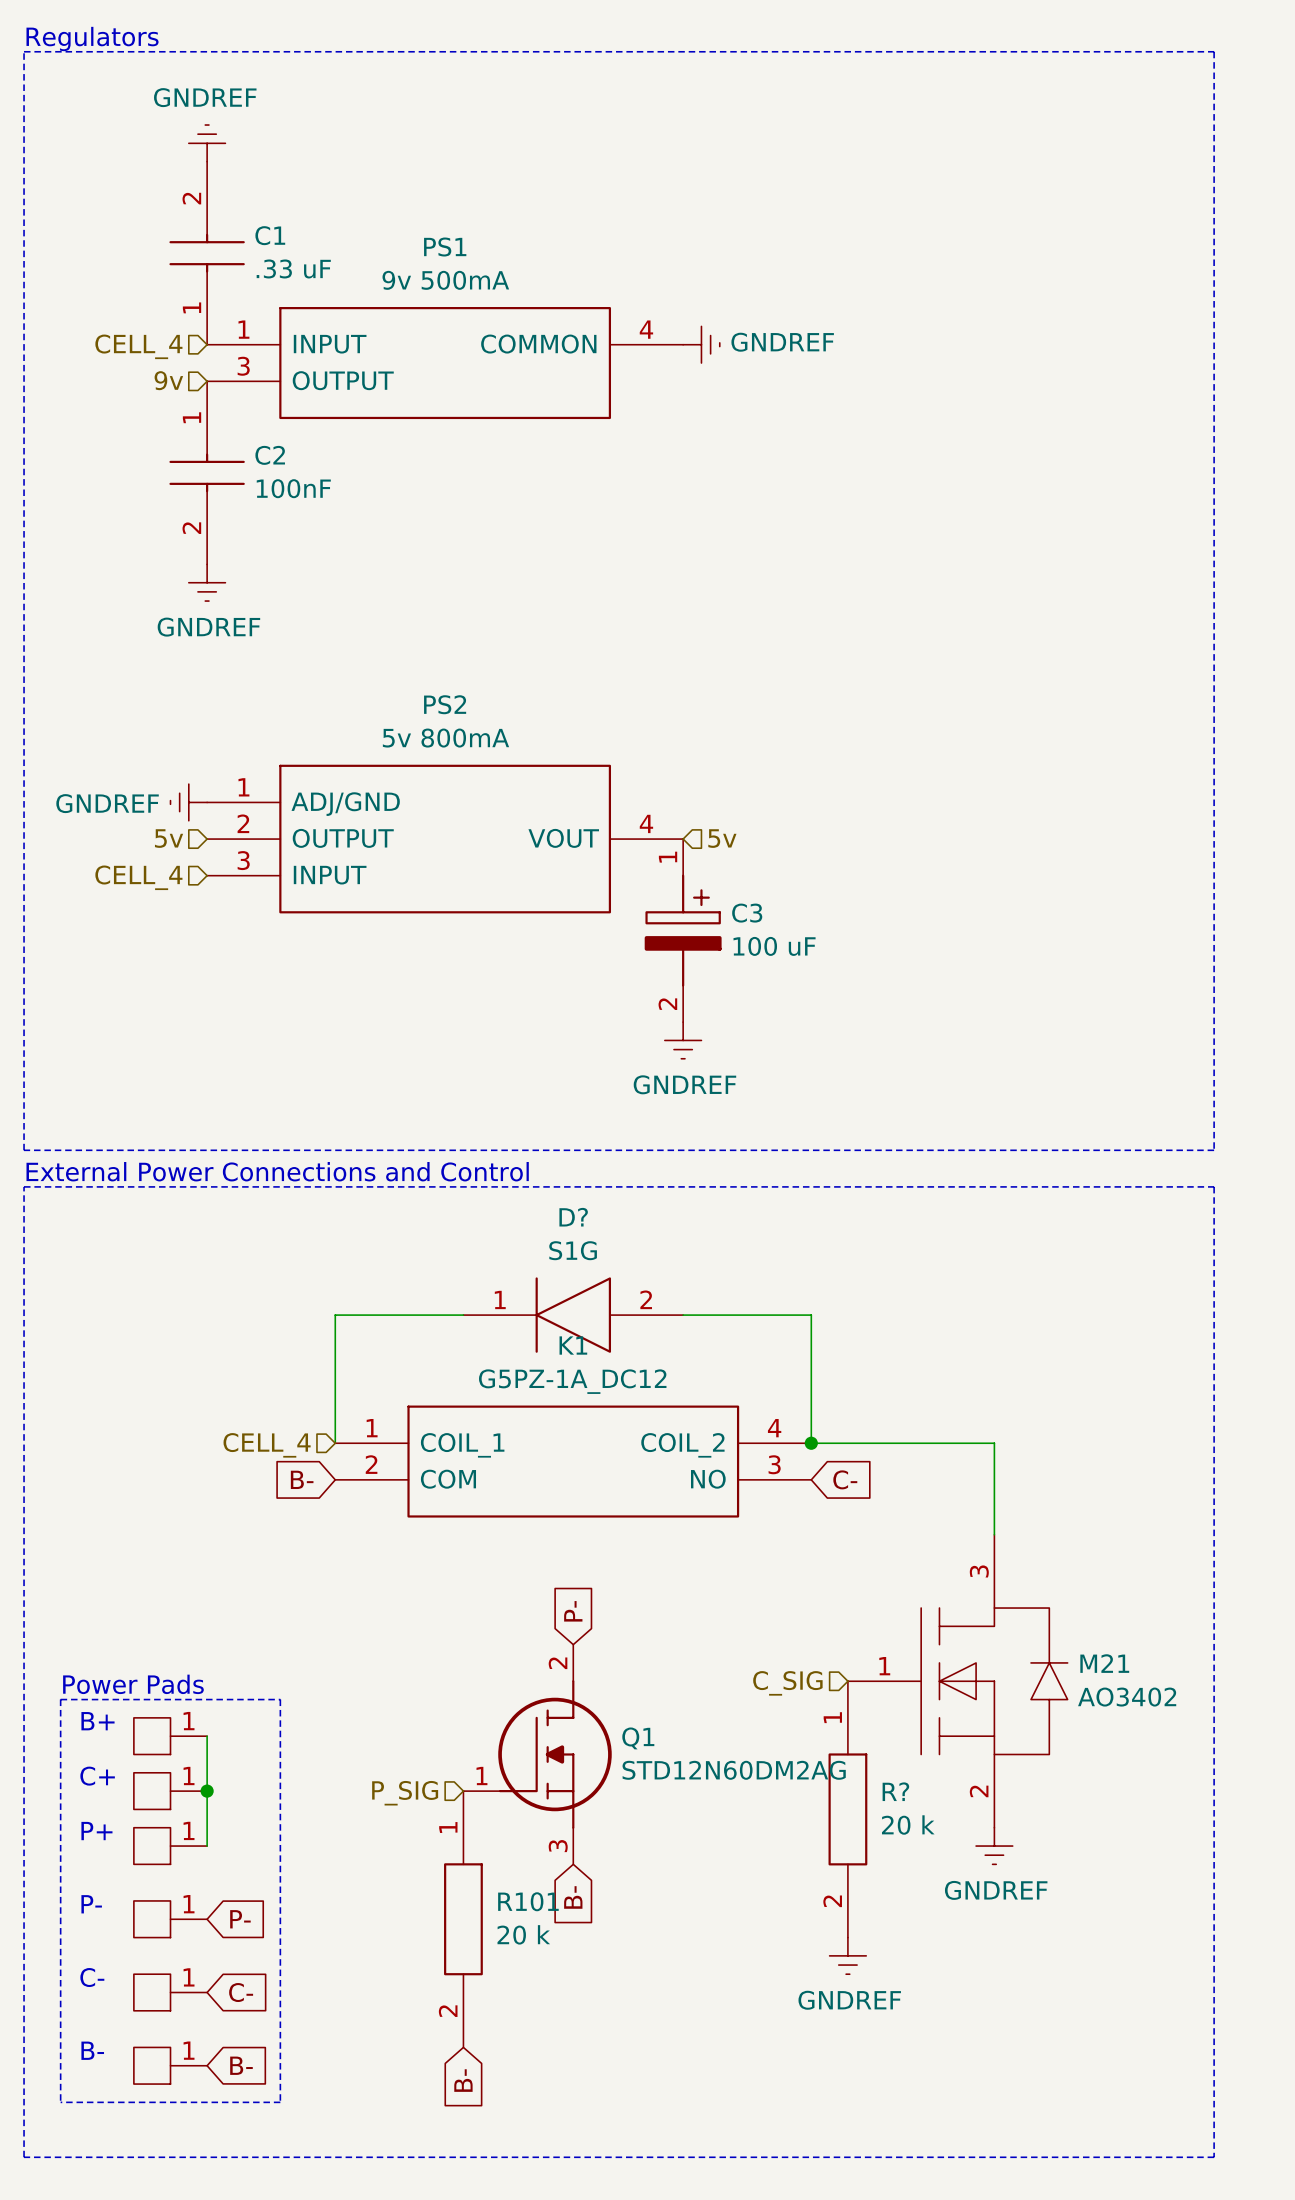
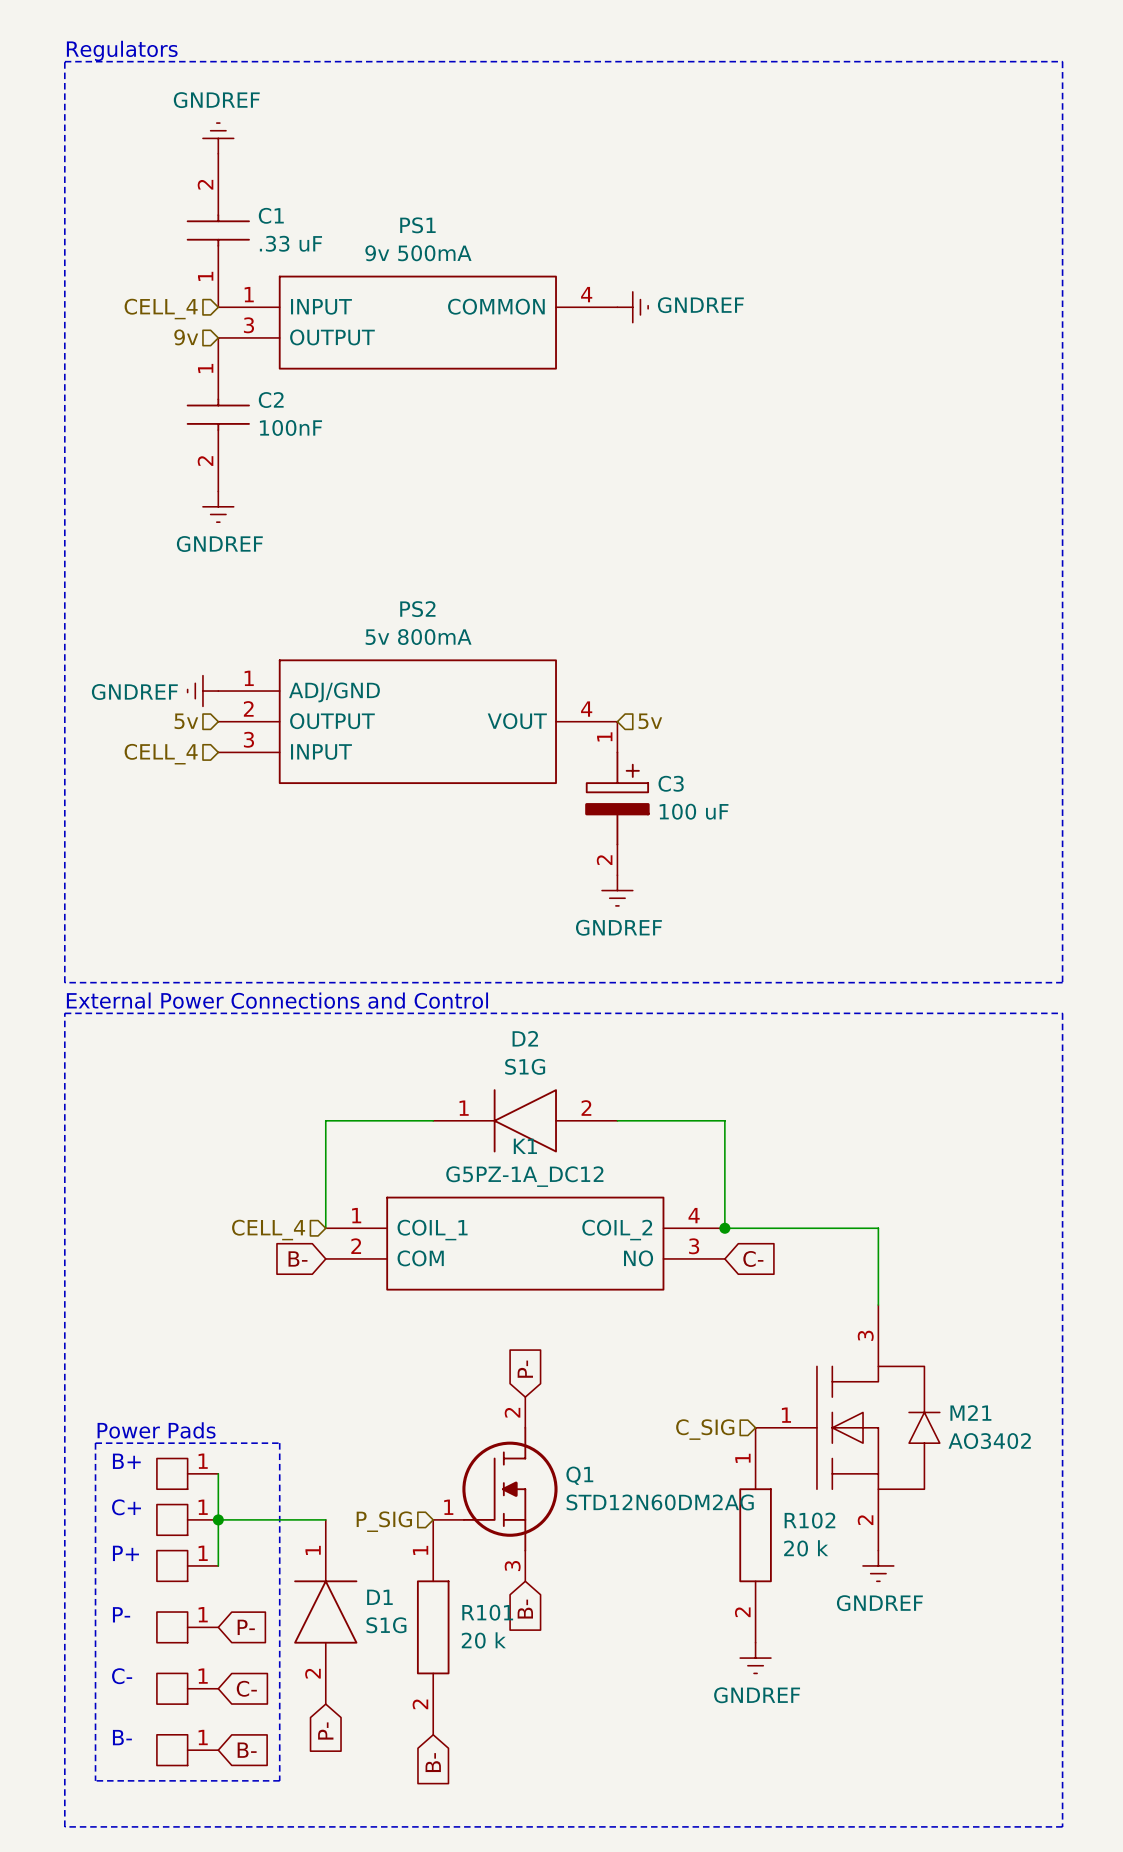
D? name: D? (573, 1217) -> D2 (525, 1038)
wire: none -> (218, 1519) (325, 1519)
R? name: R? (895, 1791) -> R102 (809, 1520)
D1: none -> S1G (325, 1612)
global label: none -> P- (325, 1731)

